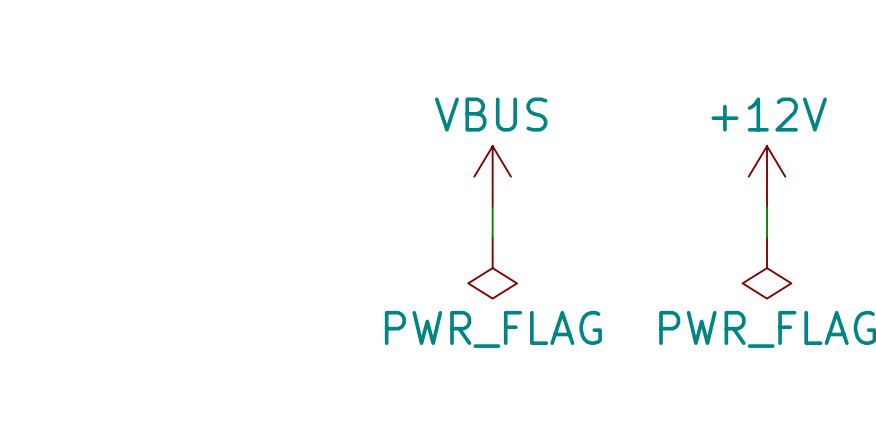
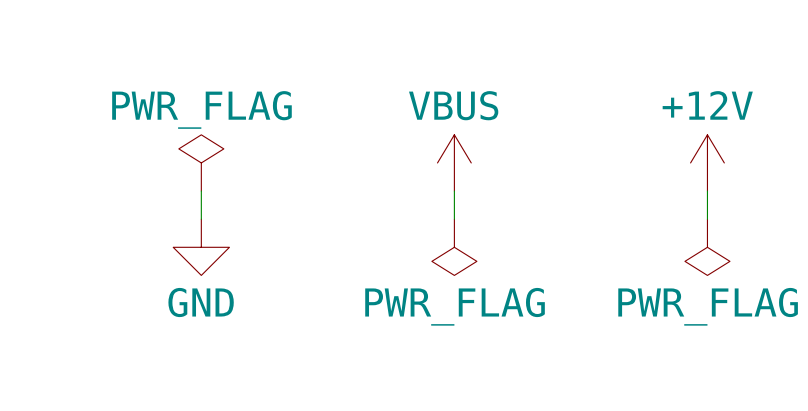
power symbol: none -> PWR_FLAG (201, 162)
wire: none -> (201, 191) (201, 219)
power symbol: none -> GND (201, 247)

